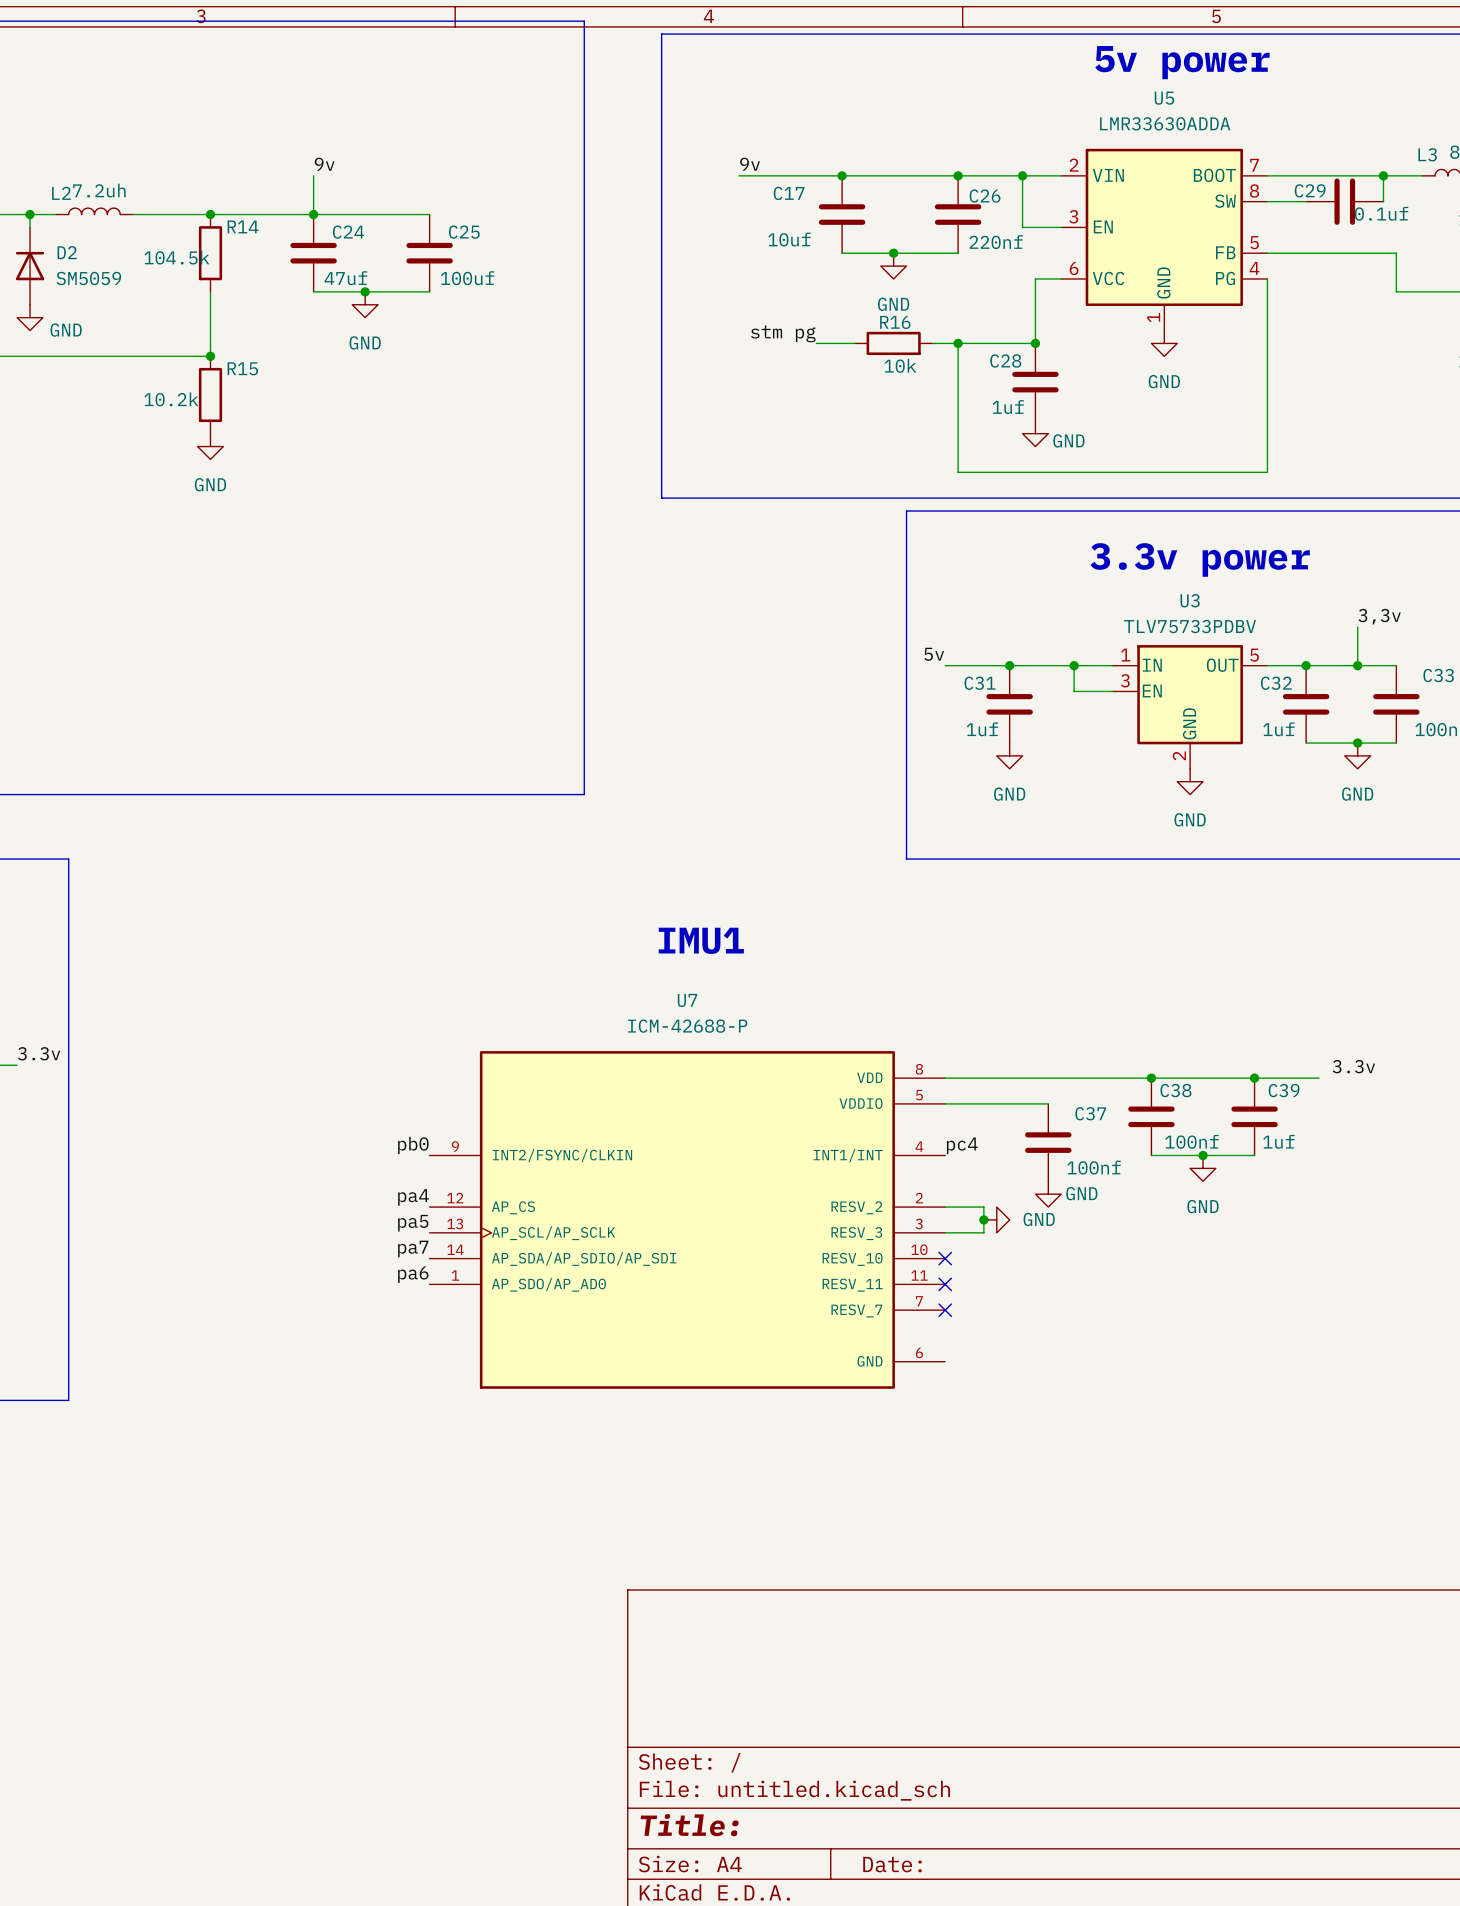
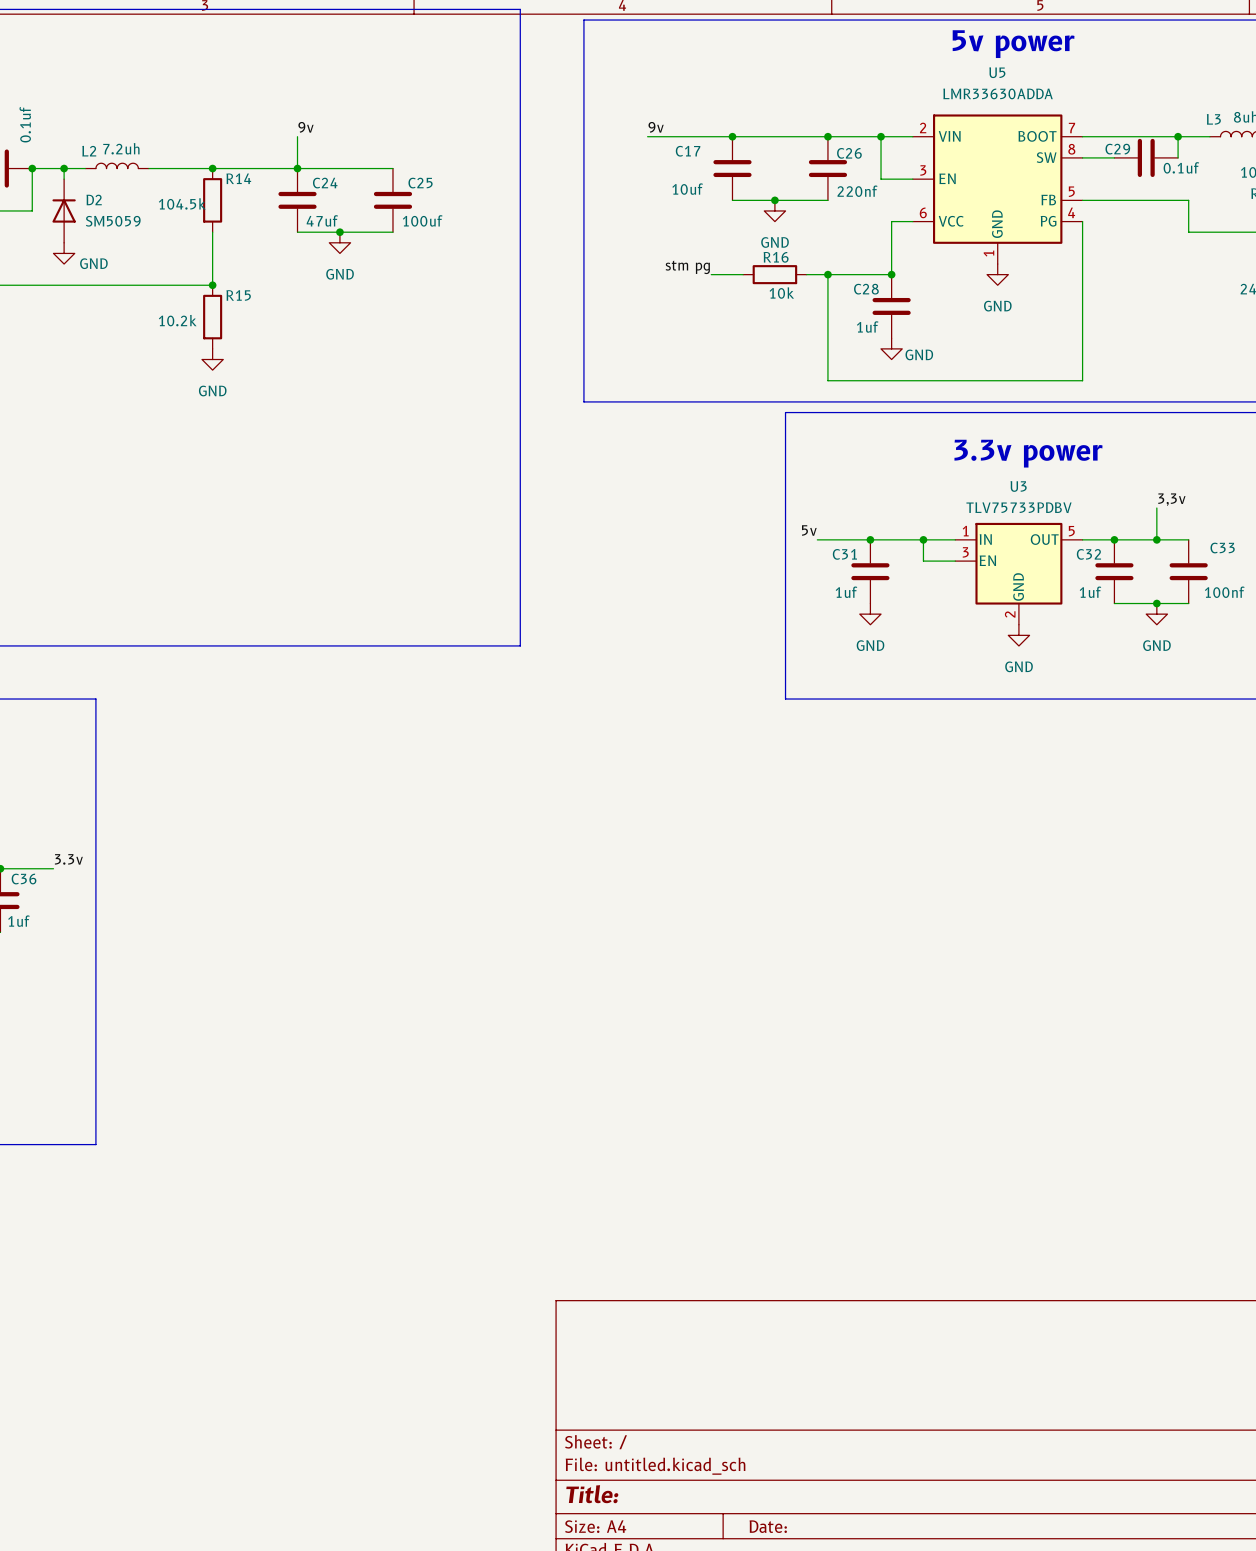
text: IMU1 (701, 940) -> none
label: 3.3v (1353, 1066) -> none
wire: (945, 1078) (1319, 1078) -> none
junction: (1151, 1078) -> none
junction: (1254, 1078) -> none
wire: (945, 1103) (1048, 1103) -> none
C38: 100nf (1151, 1116) -> none
C39: 1uf (1254, 1116) -> none
C37: 100nf (1048, 1142) -> none
label: pb0 (413, 1145) -> none
label: pc4 (962, 1145) -> none
wire: (1151, 1155) (1254, 1155) -> none
junction: (1203, 1155) -> none
power symbol: GND (1203, 1168) -> none
power symbol: GND (1048, 1194) -> none
label: pa4 (413, 1197) -> none
wire: (945, 1207) (983, 1207) (983, 1232) (945, 1232) -> none
U7: ICM-42688-P (687, 1219) -> none
junction: (983, 1219) -> none
power symbol: GND (996, 1219) -> none
label: pa5 (413, 1223) -> none
label: pa7 (413, 1248) -> none
no-connect mark: (945, 1258) -> none
label: pa6 (413, 1274) -> none
no-connect mark: (945, 1284) -> none
no-connect mark: (945, 1310) -> none

